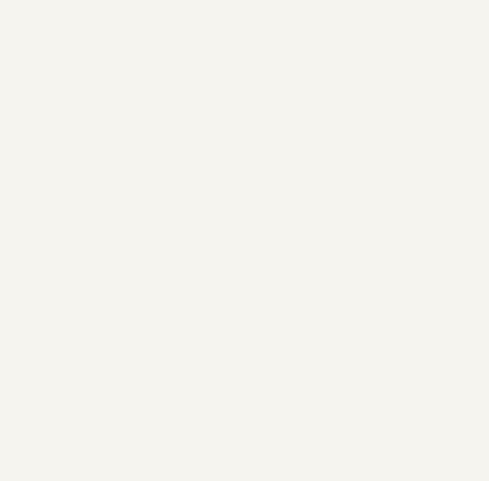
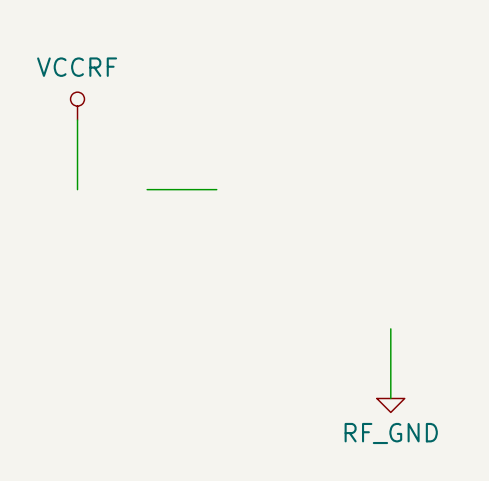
power symbol: none -> VCCRF (77, 106)
wire: none -> (77, 120) (77, 189)
wire: none -> (147, 189) (216, 189)
wire: none -> (390, 328) (390, 398)
power symbol: none -> RF_GND (390, 405)

